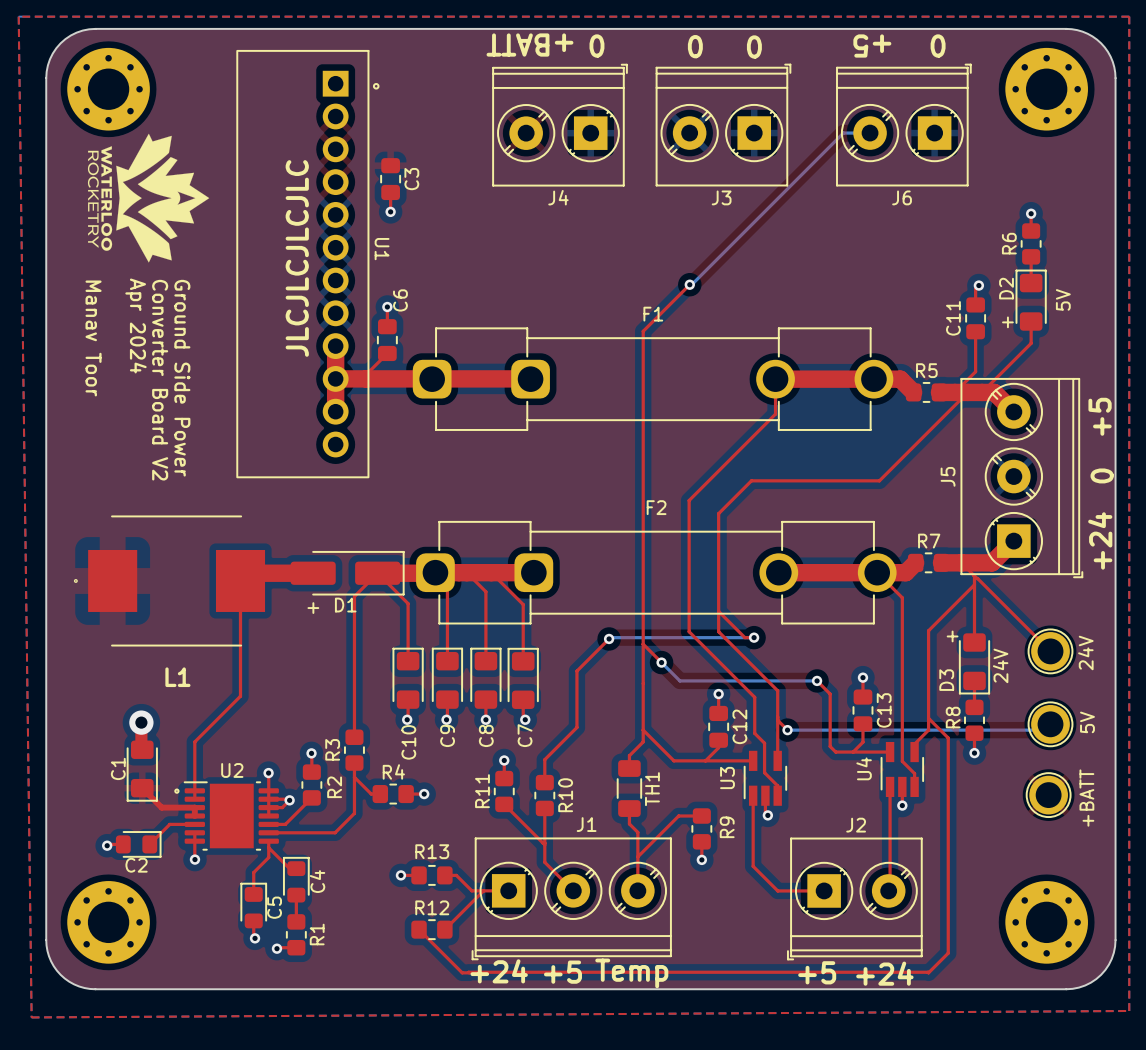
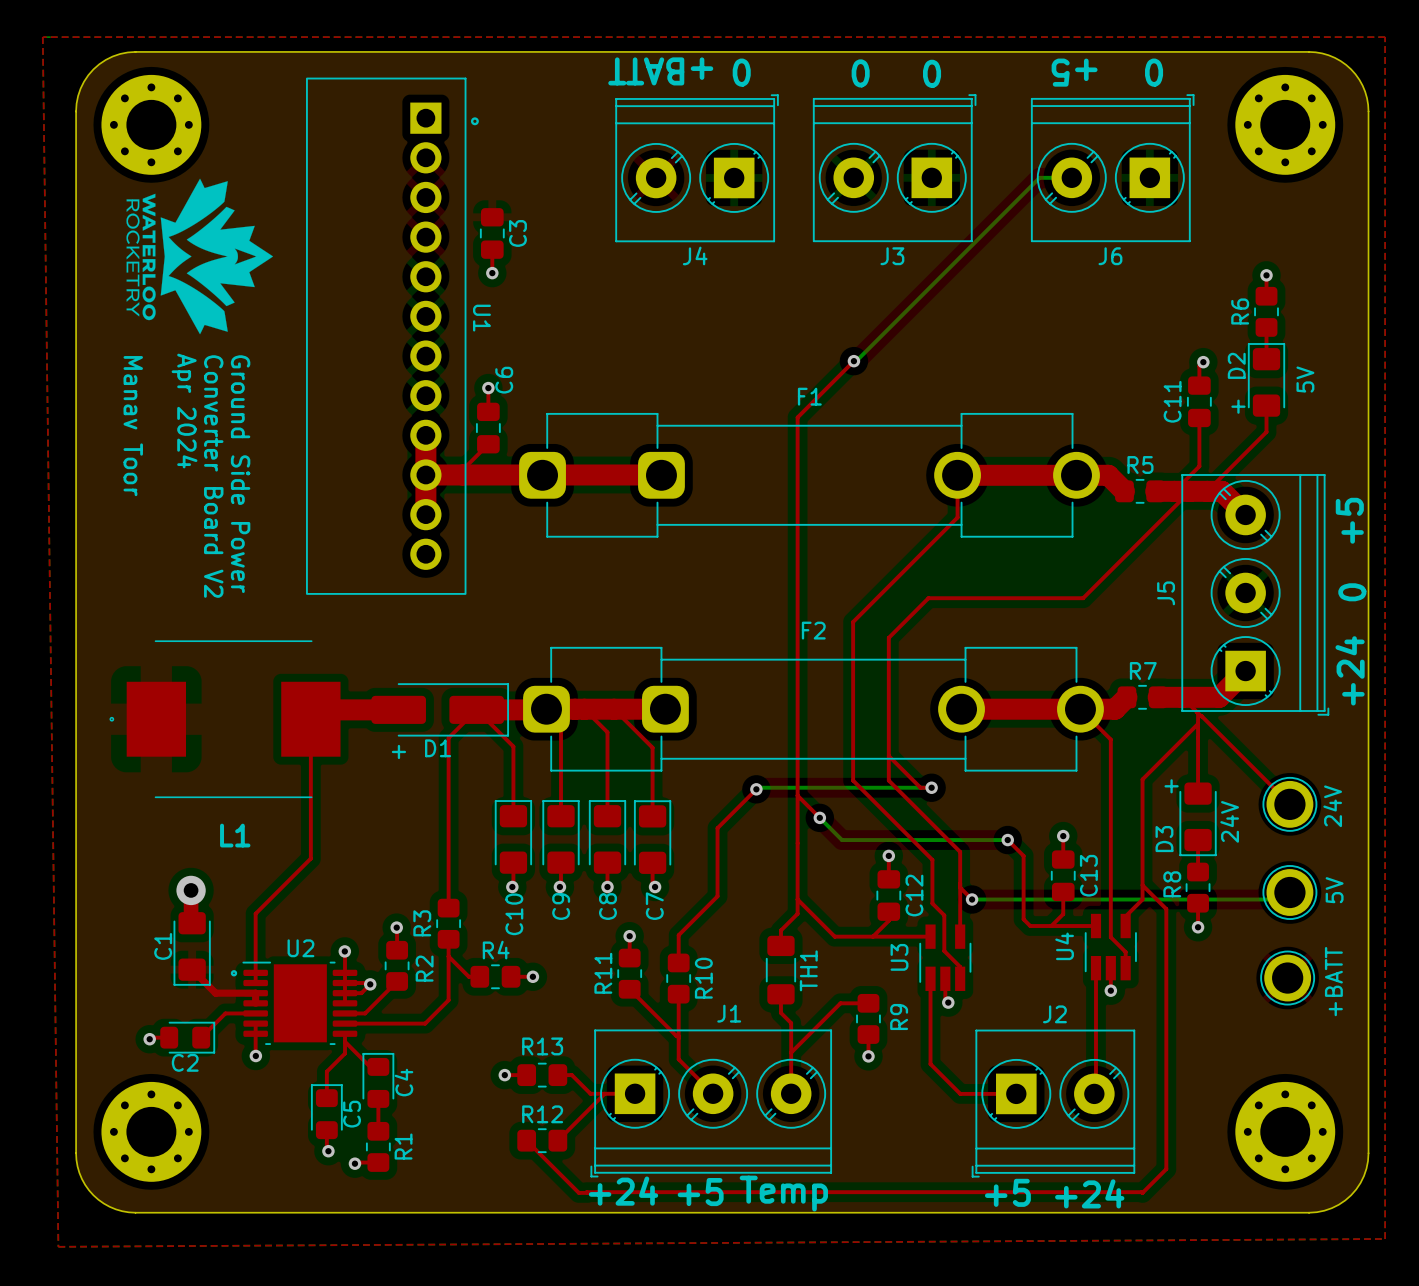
text: JLCJLCJLCJLC (297, 258) -> none

